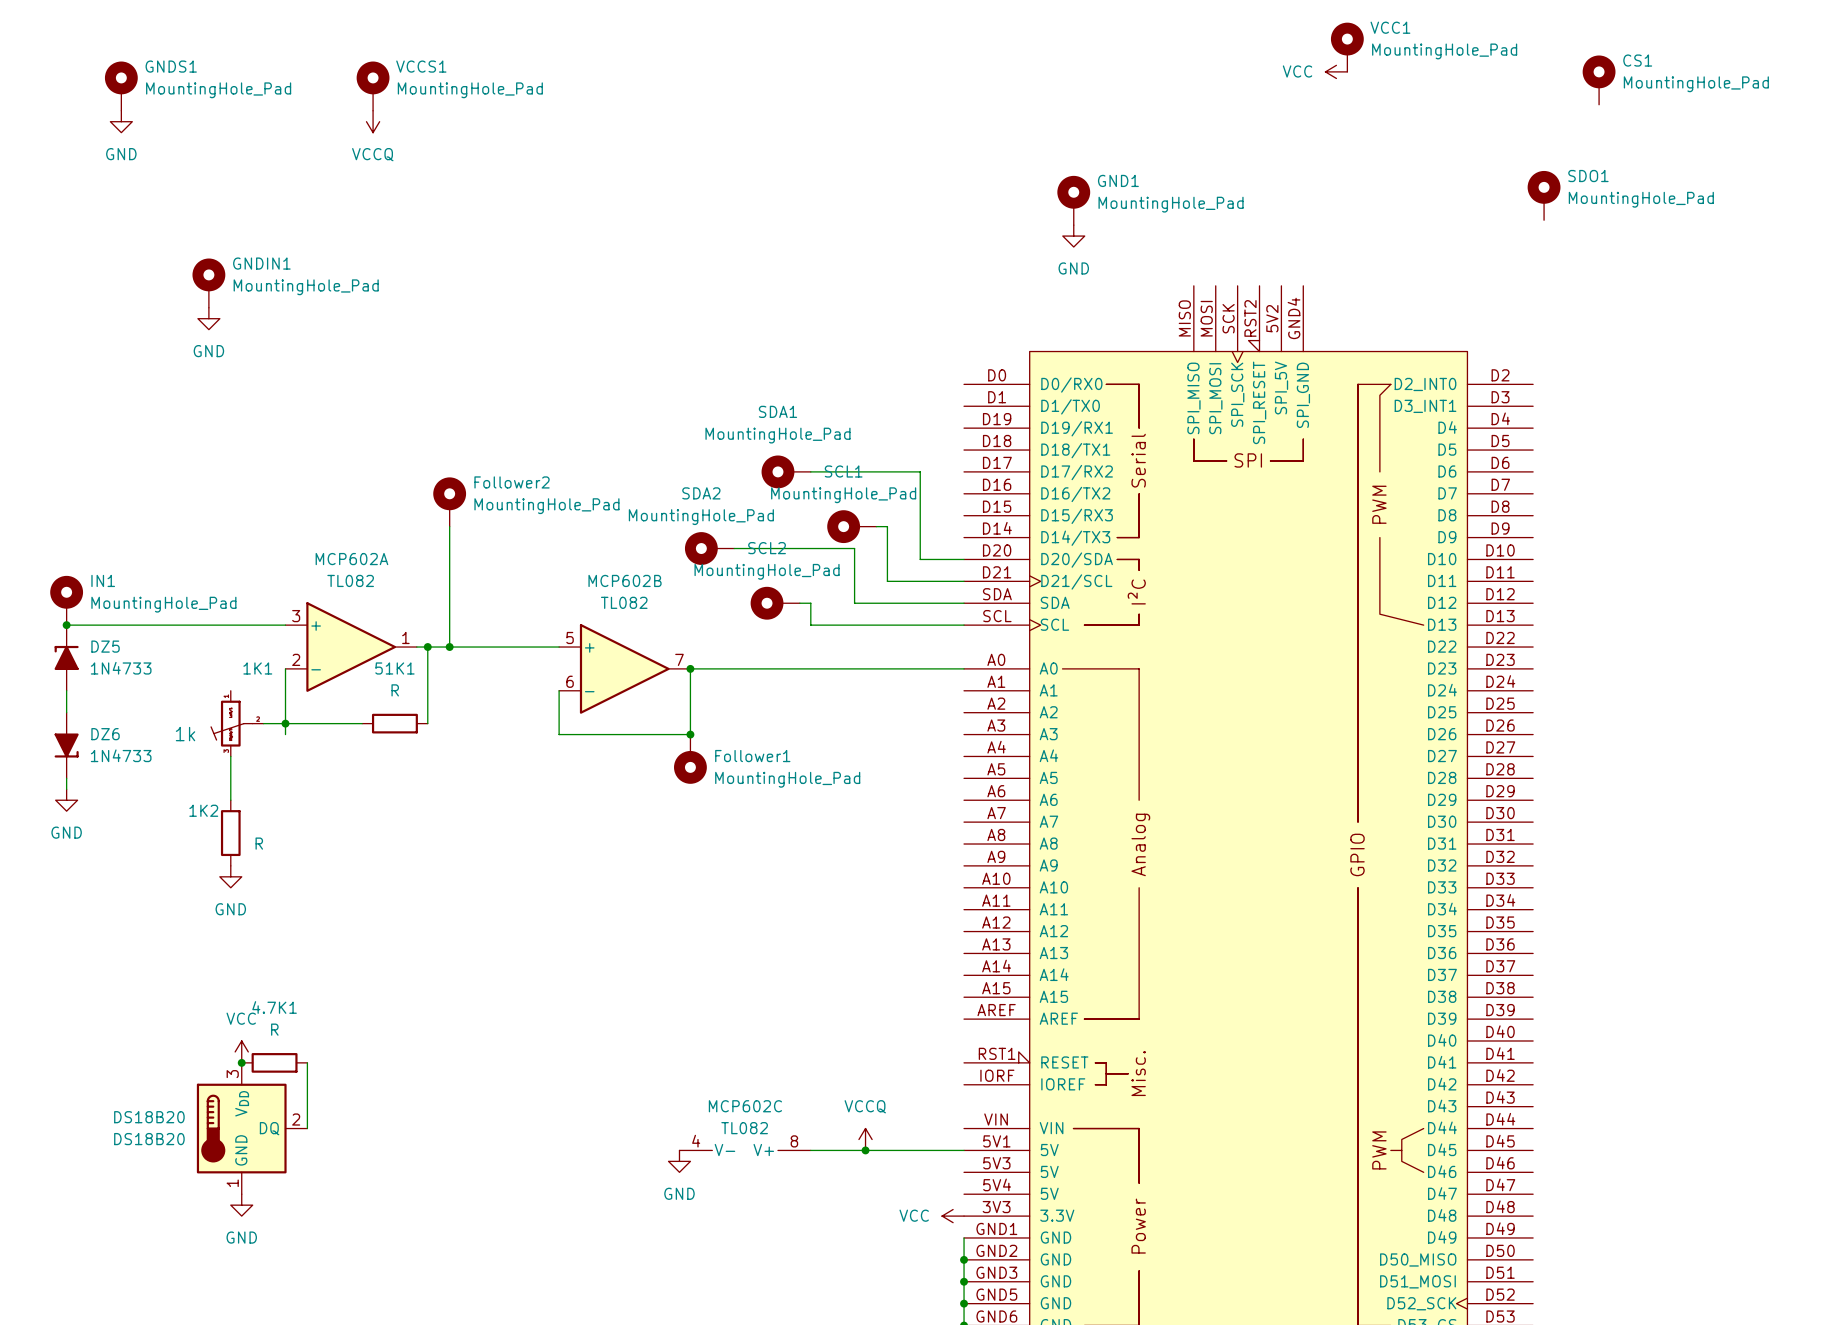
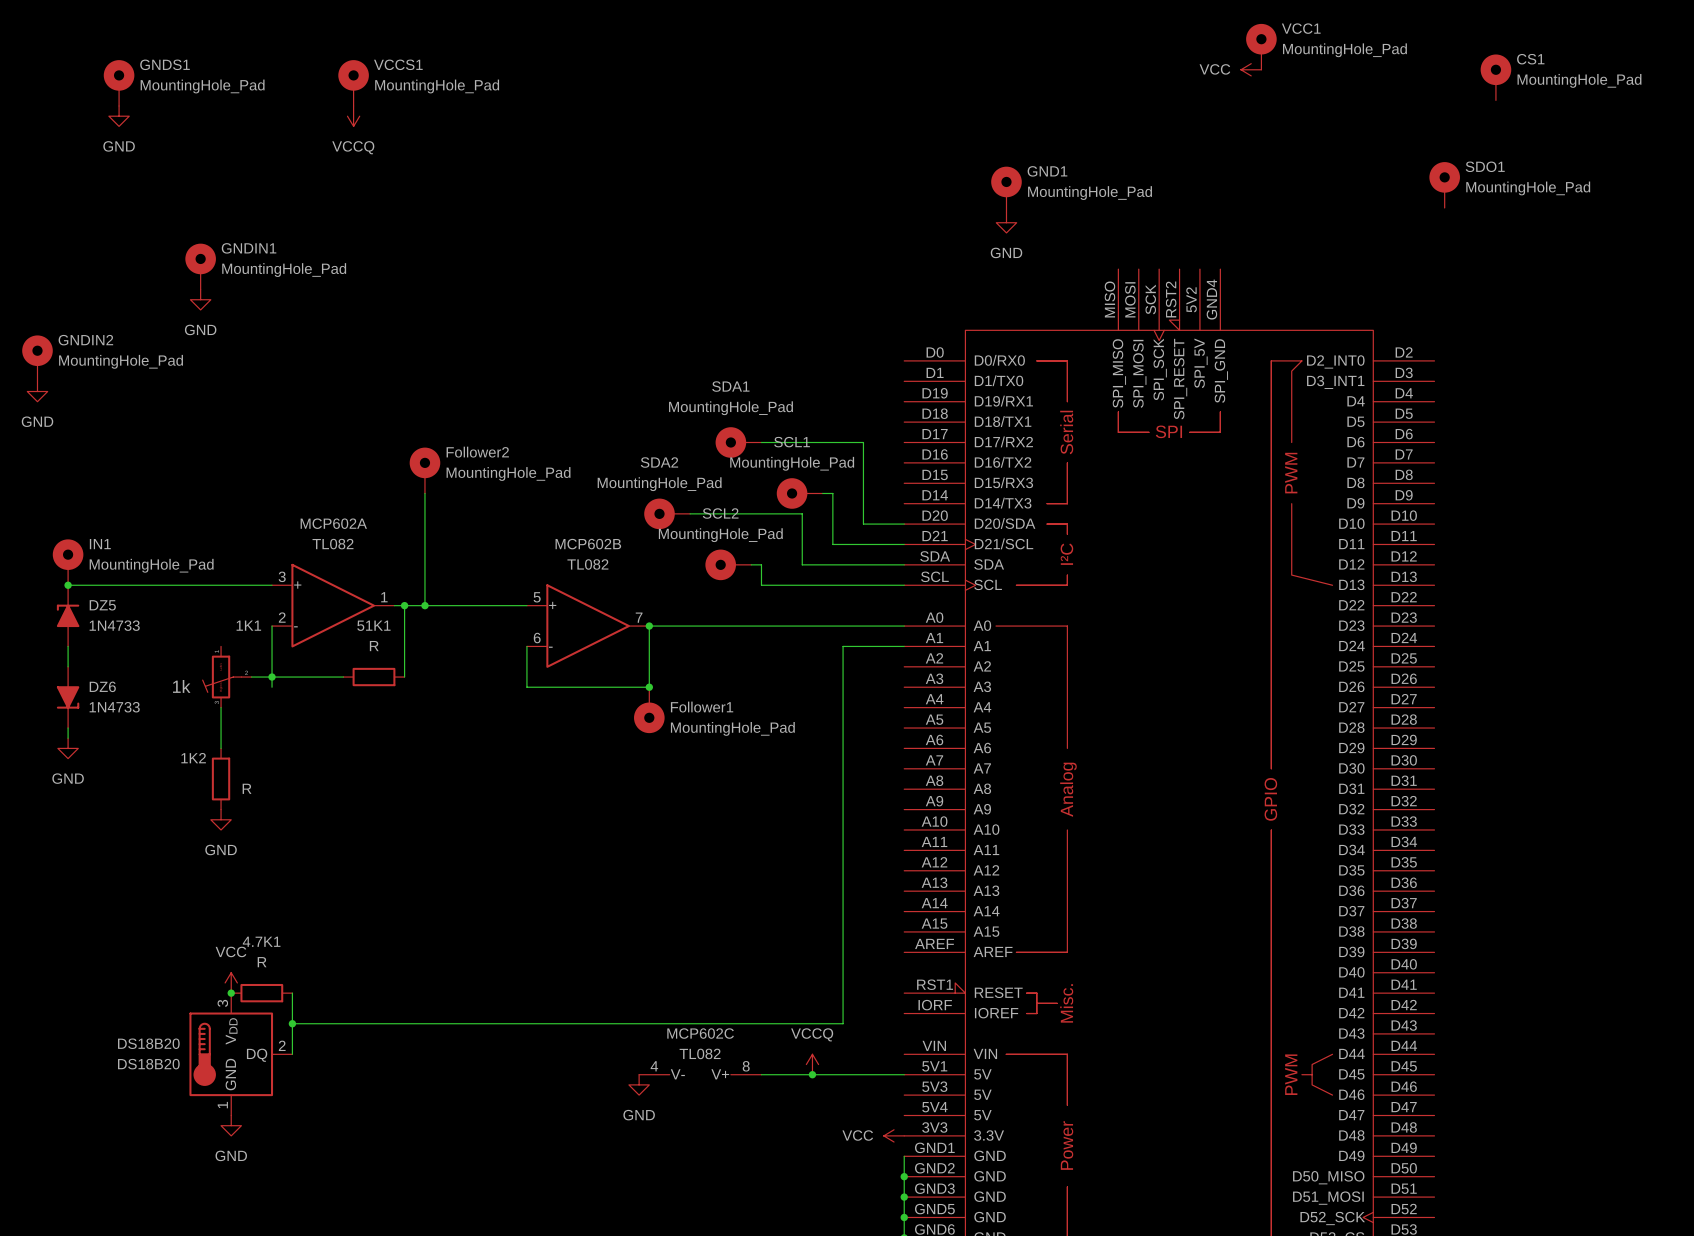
GNDIN2: none -> MountingHole_Pad (37, 358)
power symbol: none -> GND (37, 391)
wire: none -> (904, 646) (843, 646) (843, 1023) (292, 1023)
junction: none -> (292, 1023)

